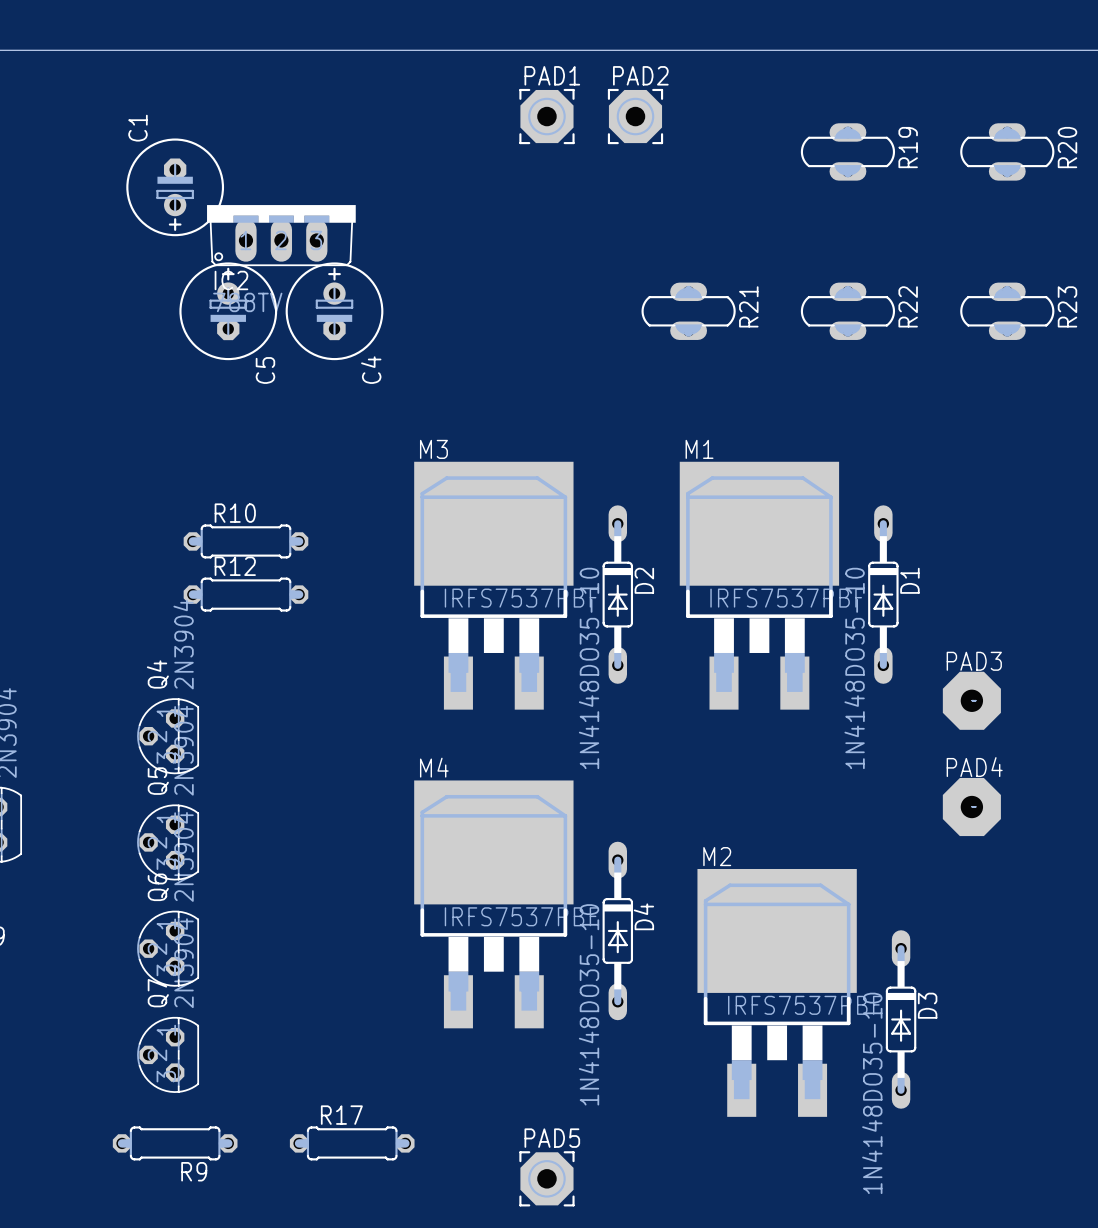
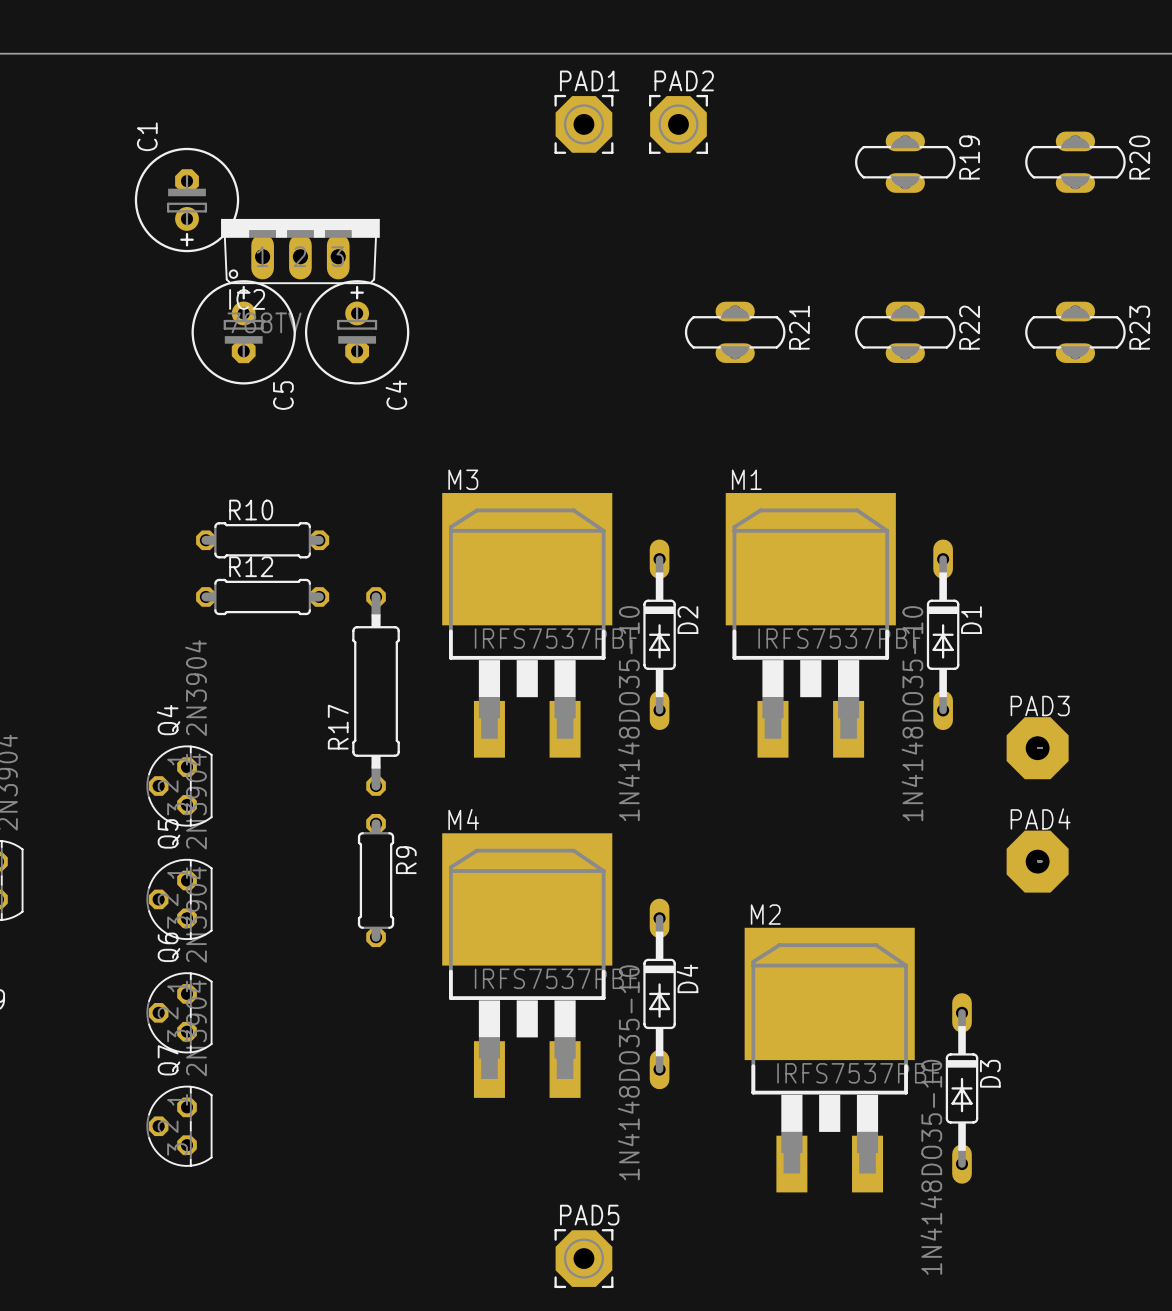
R10 position: (245, 541) -> (262, 540)
R12 position: (245, 594) -> (262, 596)
R17 name position: R17 (341, 1115) -> R17 (338, 727)
R17 footprint: [289, 1126, 415, 1161] -> [352, 587, 400, 796]
R9 rotation: 0° (175, 1143) -> 90° clockwise (376, 880)
R9 position: (175, 1143) -> (376, 880)
R9 name position: R9 (194, 1171) -> R9 (406, 860)

